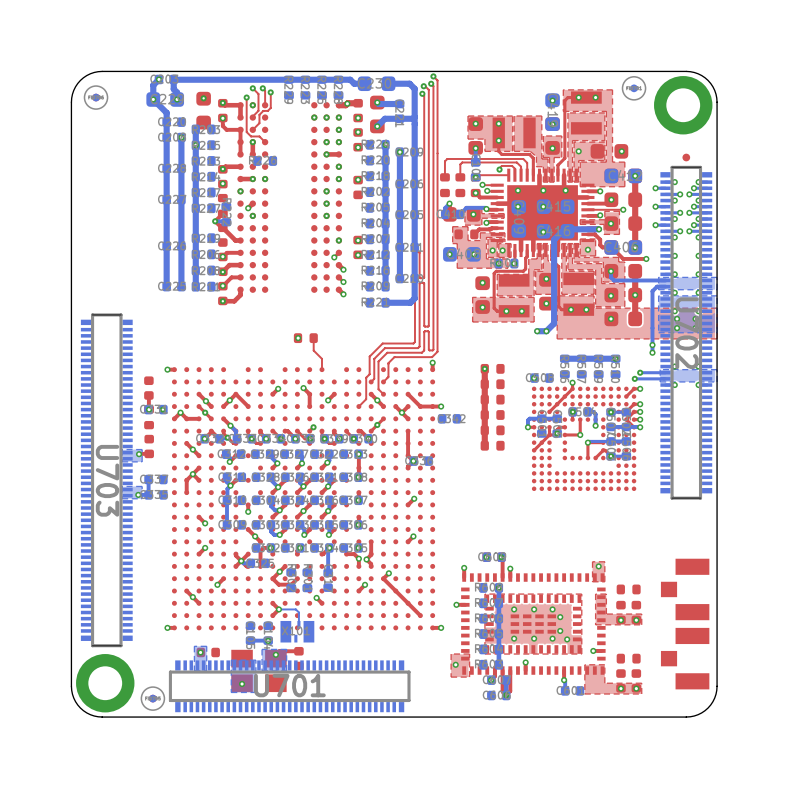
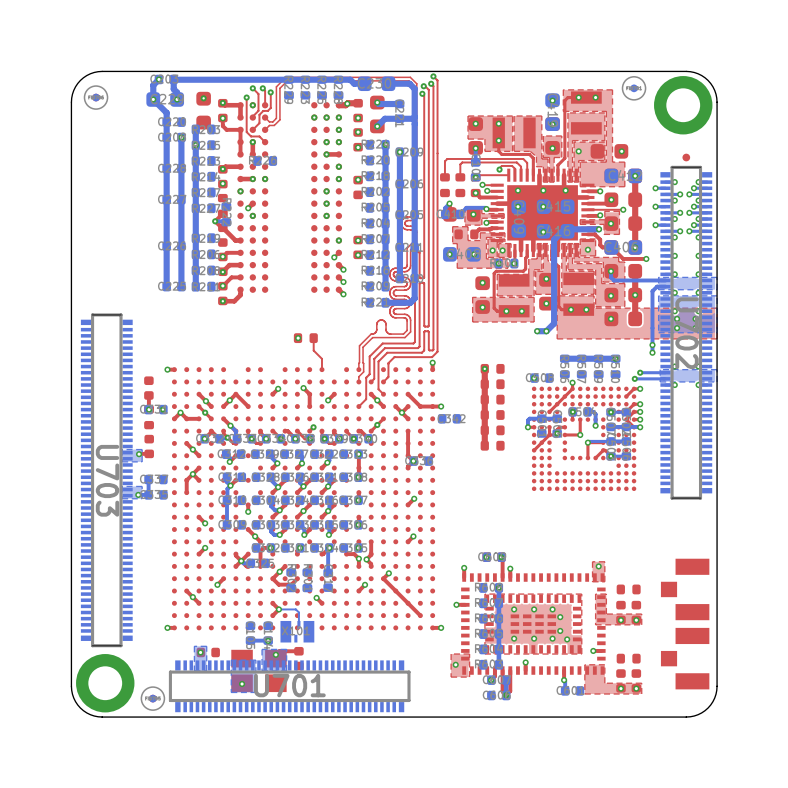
top track: none -> (265, 117) (269, 121) (272, 121) (276, 118) (276, 86) (285, 77) (410, 77) (416, 83) (416, 214) (414, 219) (406, 220) (405, 223) (416, 229) (416, 243) (410, 249) (409, 269) (405, 271) (395, 271) (393, 274) (395, 277) (407, 278) (410, 282) (408, 288) (395, 290) (393, 293) (395, 295) (408, 297) (410, 305) (405, 308) (395, 308) (393, 311) (395, 314) (405, 314) (409, 316) (410, 331) (404, 337) (372, 337) (363, 347) (363, 371) (358, 376) (358, 381)
top track: none -> (265, 129) (269, 125) (274, 125) (279, 119) (279, 88) (287, 80) (408, 80) (413, 85) (413, 214) (411, 216) (403, 218) (401, 223) (403, 228) (412, 231) (413, 242) (407, 248) (406, 267) (393, 268) (389, 274) (393, 280) (404, 281) (407, 283) (405, 286) (394, 286) (390, 290) (392, 298) (404, 299) (407, 302) (404, 305) (393, 305) (389, 311) (393, 317) (406, 318) (407, 330) (403, 334) (389, 333) (386, 331) (385, 321) (378, 321) (375, 332) (371, 334) (359, 345) (358, 369)

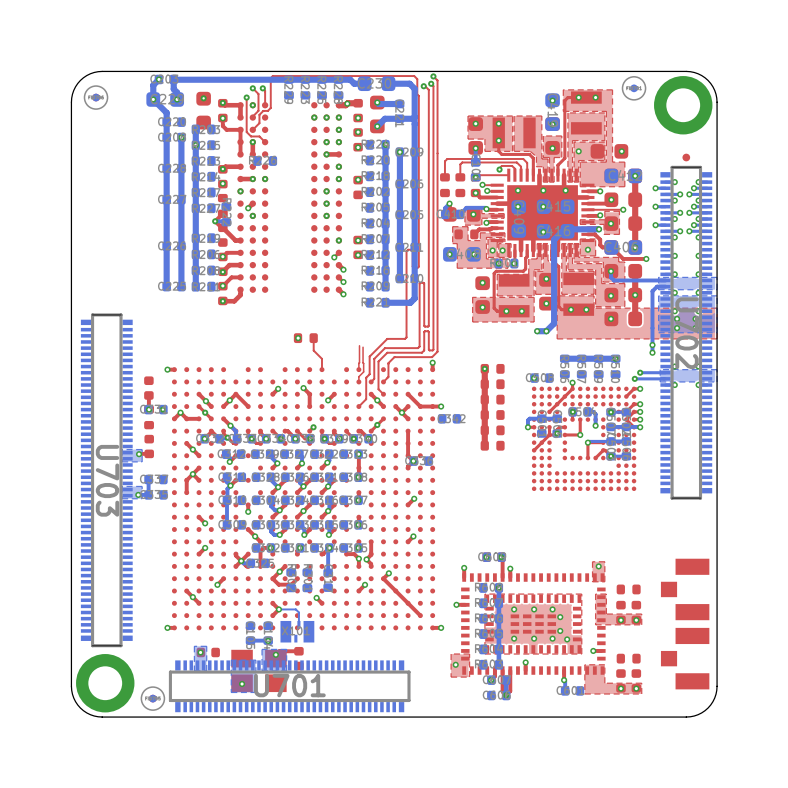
via: (270, 92) -> none
top track: (422, 93) (424, 95) (424, 277) (419, 277) (419, 252) (415, 252) (414, 341) (382, 343) -> (270, 92) (270, 78) (272, 76) (414, 76) (417, 79) (418, 266) (417, 268) (412, 266) (412, 251) (408, 249) (406, 251) (406, 337) (387, 338) (382, 343)
via: (422, 93) -> none
top track: (265, 117) (269, 121) (272, 121) (276, 118) (276, 86) (285, 77) (410, 77) (416, 83) (416, 214) (414, 219) (406, 220) (405, 223) (416, 229) (416, 243) (410, 249) (409, 269) (405, 271) (395, 271) (393, 274) (395, 277) (407, 278) (410, 282) (408, 288) (395, 290) (393, 293) (395, 295) (408, 297) (410, 305) (405, 308) (395, 308) (393, 311) (395, 314) (405, 314) (409, 316) (410, 331) (404, 337) (372, 337) (363, 347) -> none
top track: (265, 129) (269, 125) (274, 125) (279, 119) (279, 88) (287, 80) (408, 80) (413, 85) (413, 214) (411, 216) (403, 218) (401, 223) (403, 228) (412, 231) (413, 242) (407, 248) (406, 267) (393, 268) (389, 274) (393, 280) (404, 281) (407, 283) (405, 286) (394, 286) (390, 290) (392, 298) (404, 299) (407, 302) (404, 305) (393, 305) (389, 311) (393, 317) (406, 318) (407, 330) (403, 334) (388, 333) (386, 330) (385, 322) (380, 320) (377, 322) (375, 332) (371, 334) (359, 345) -> none

